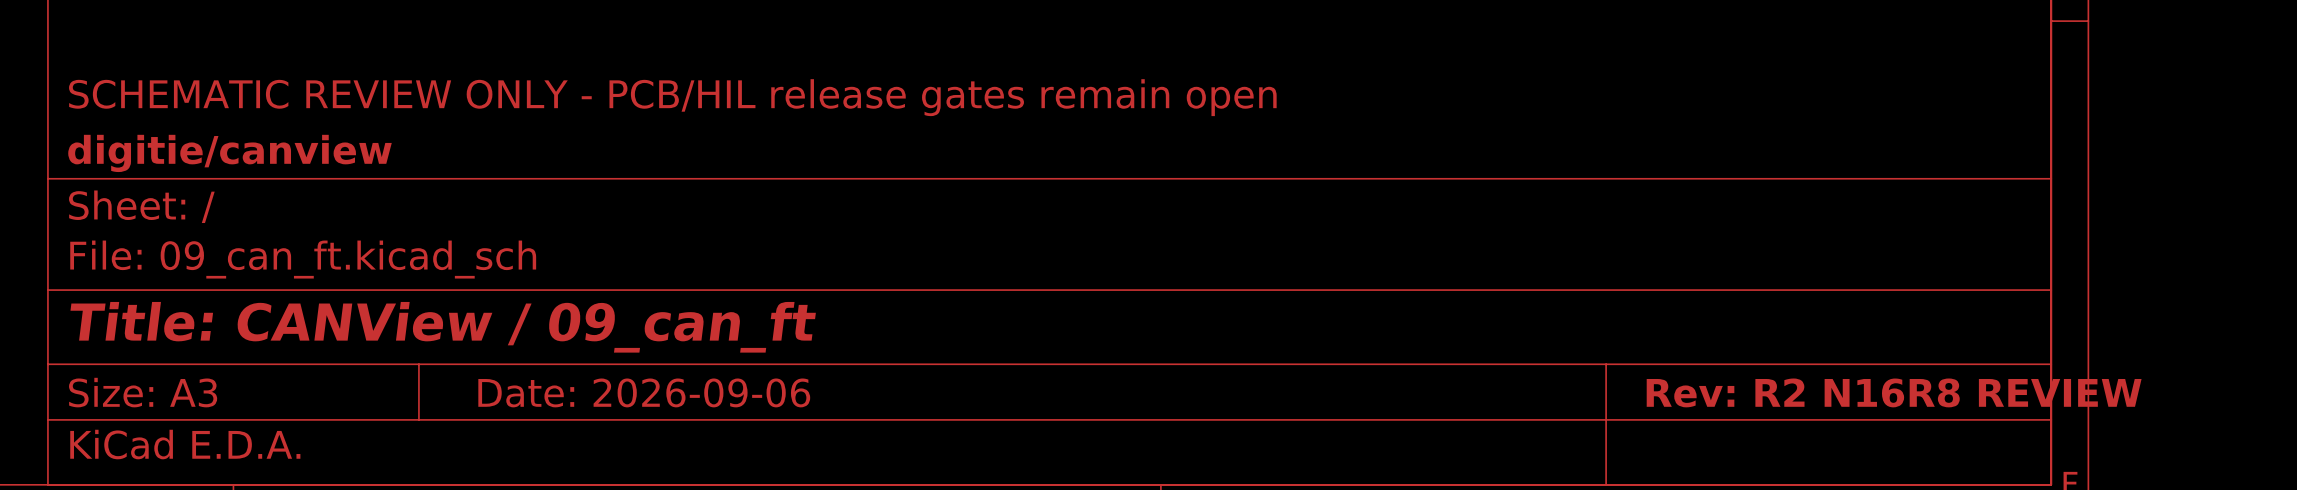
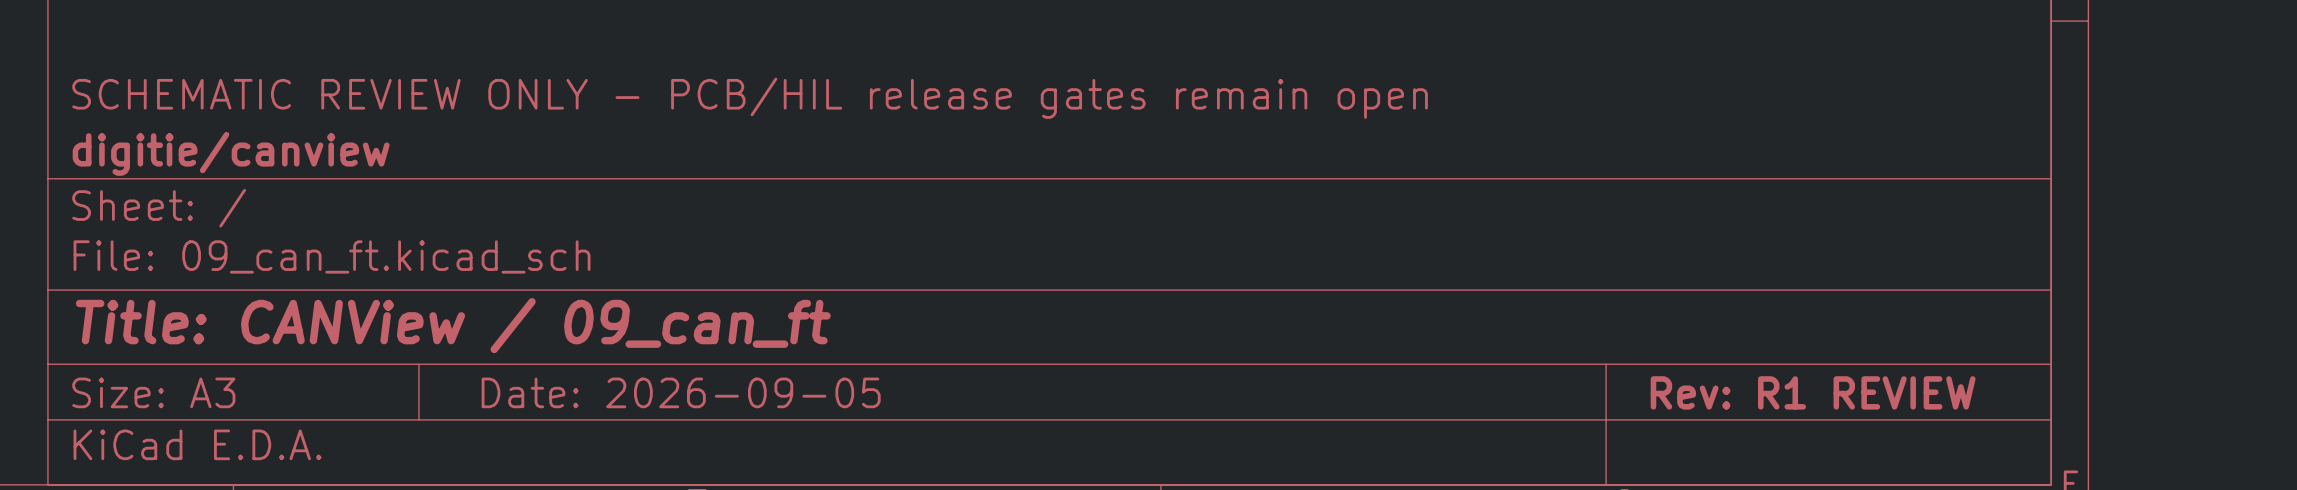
title block: Date: 2026-09-06 (644, 392) -> Date: 2026-09-05 (681, 392)
title block: Rev: R2 N16R8 REVIEW (1894, 392) -> Rev: R1 REVIEW (1813, 392)

